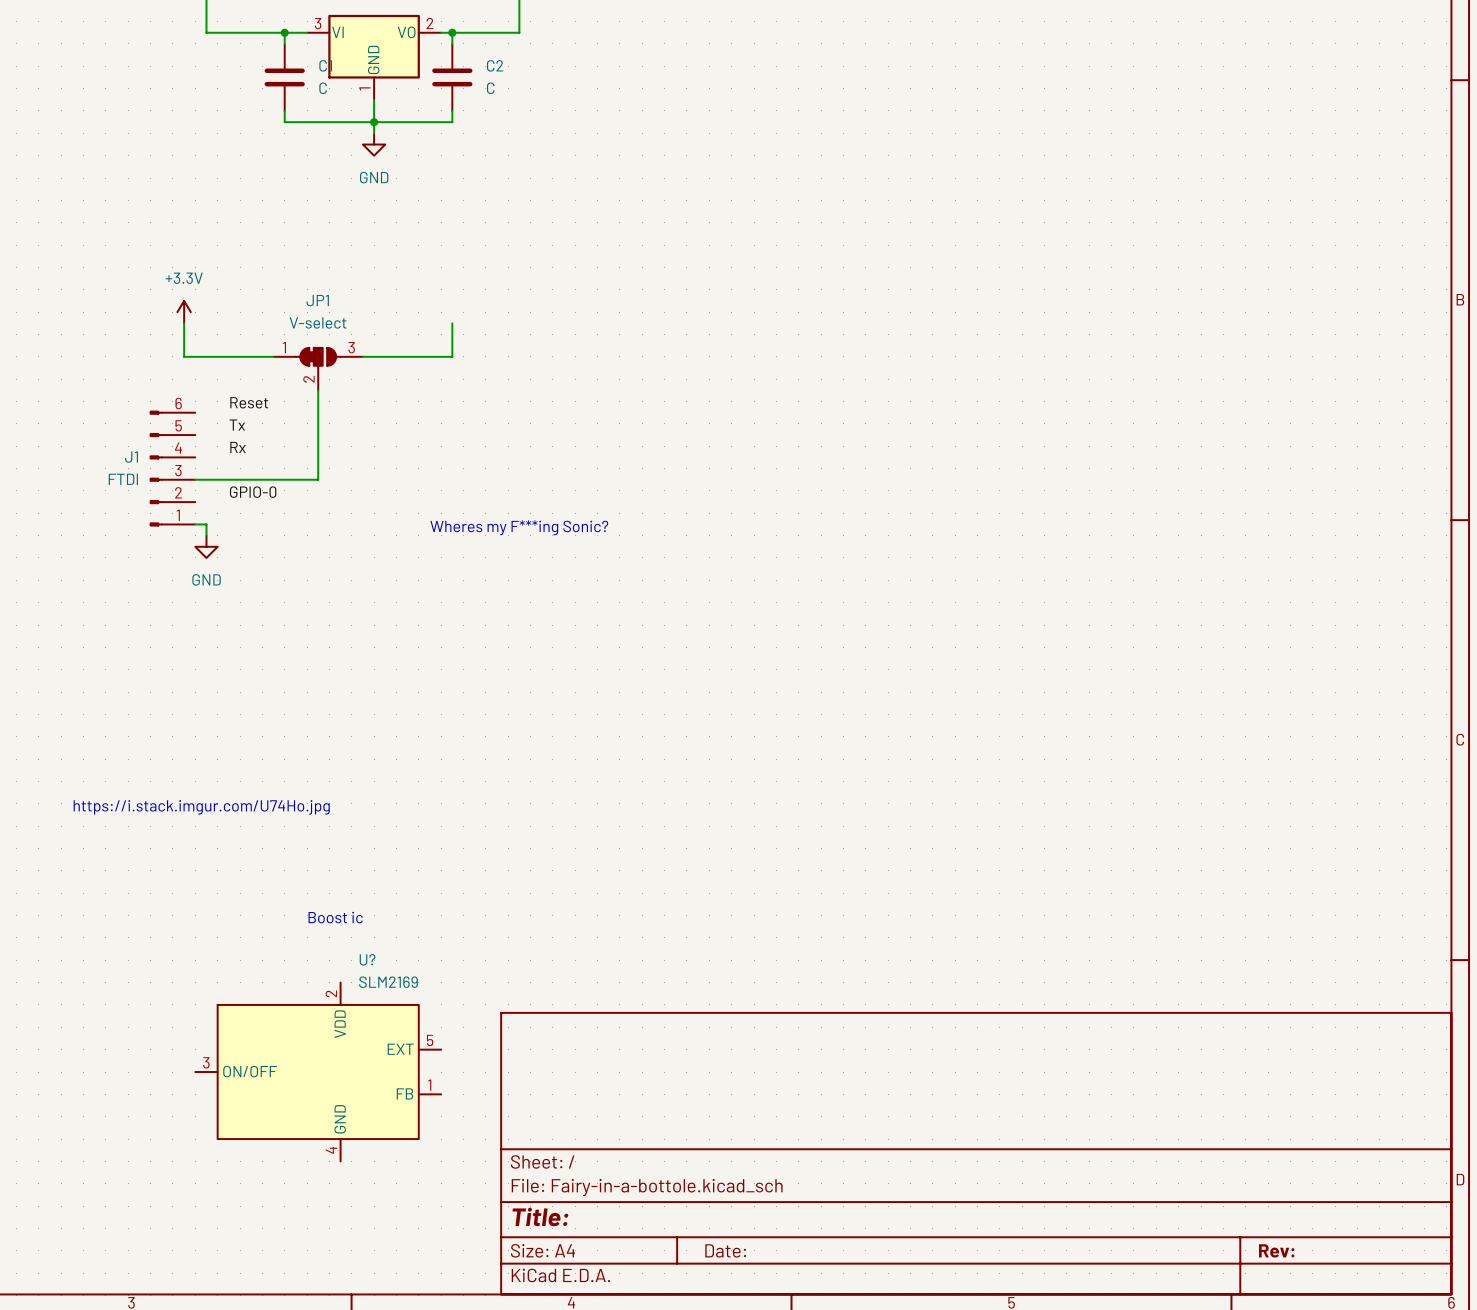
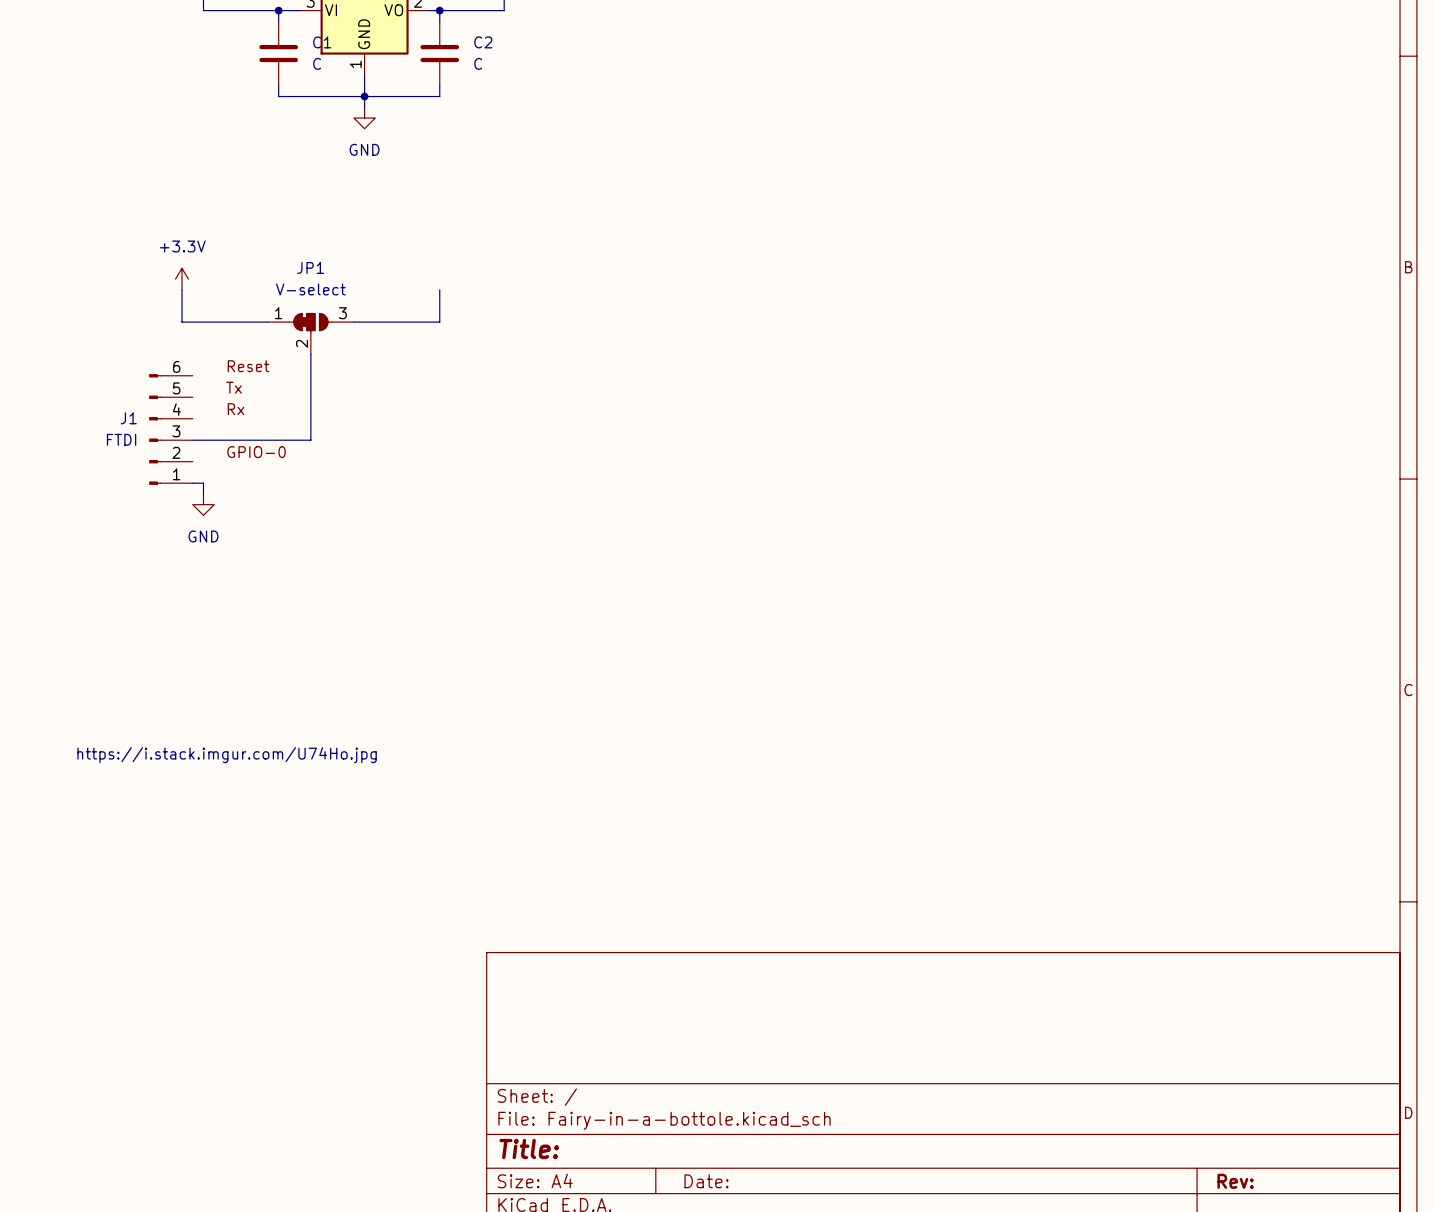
text: Wheres my F***ing Sonic? (519, 527) -> none
text: Boost ic (335, 917) -> none
U?: SLM2169 (318, 1072) -> none

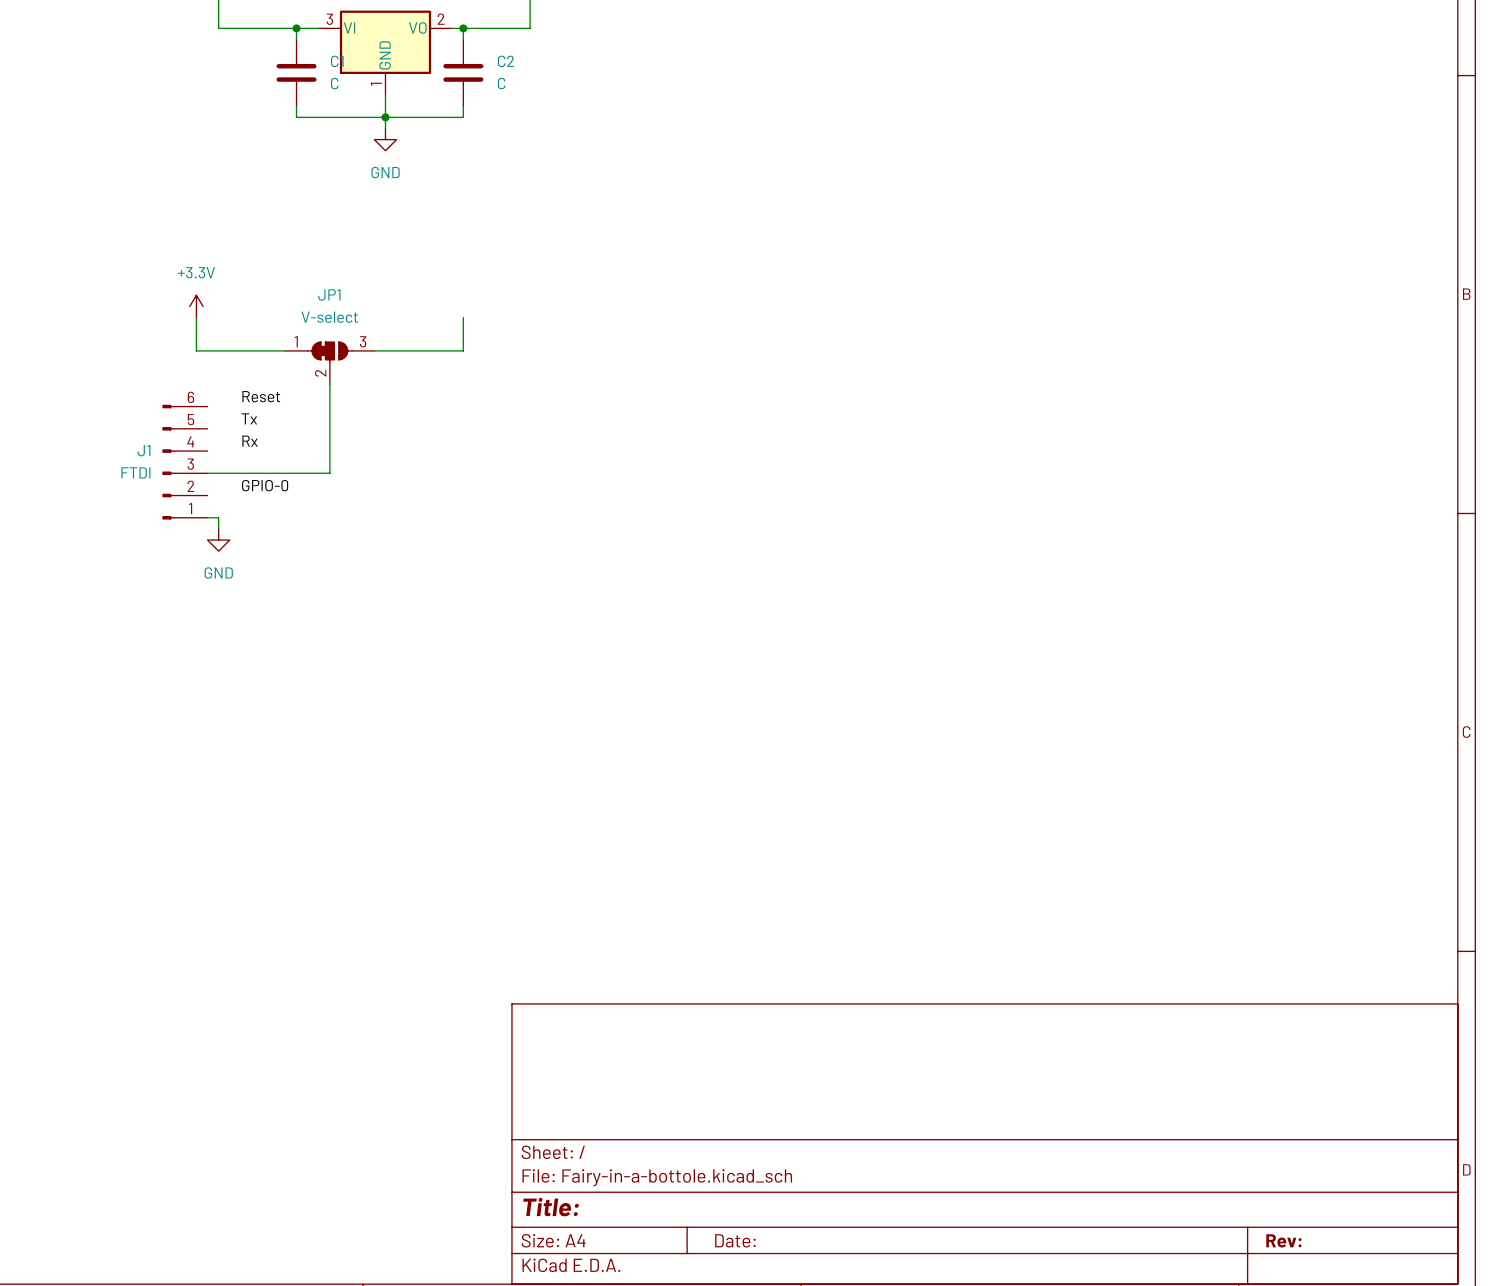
text: https://i.stack.imgur.com/U74Ho.jpg (227, 755) -> none

